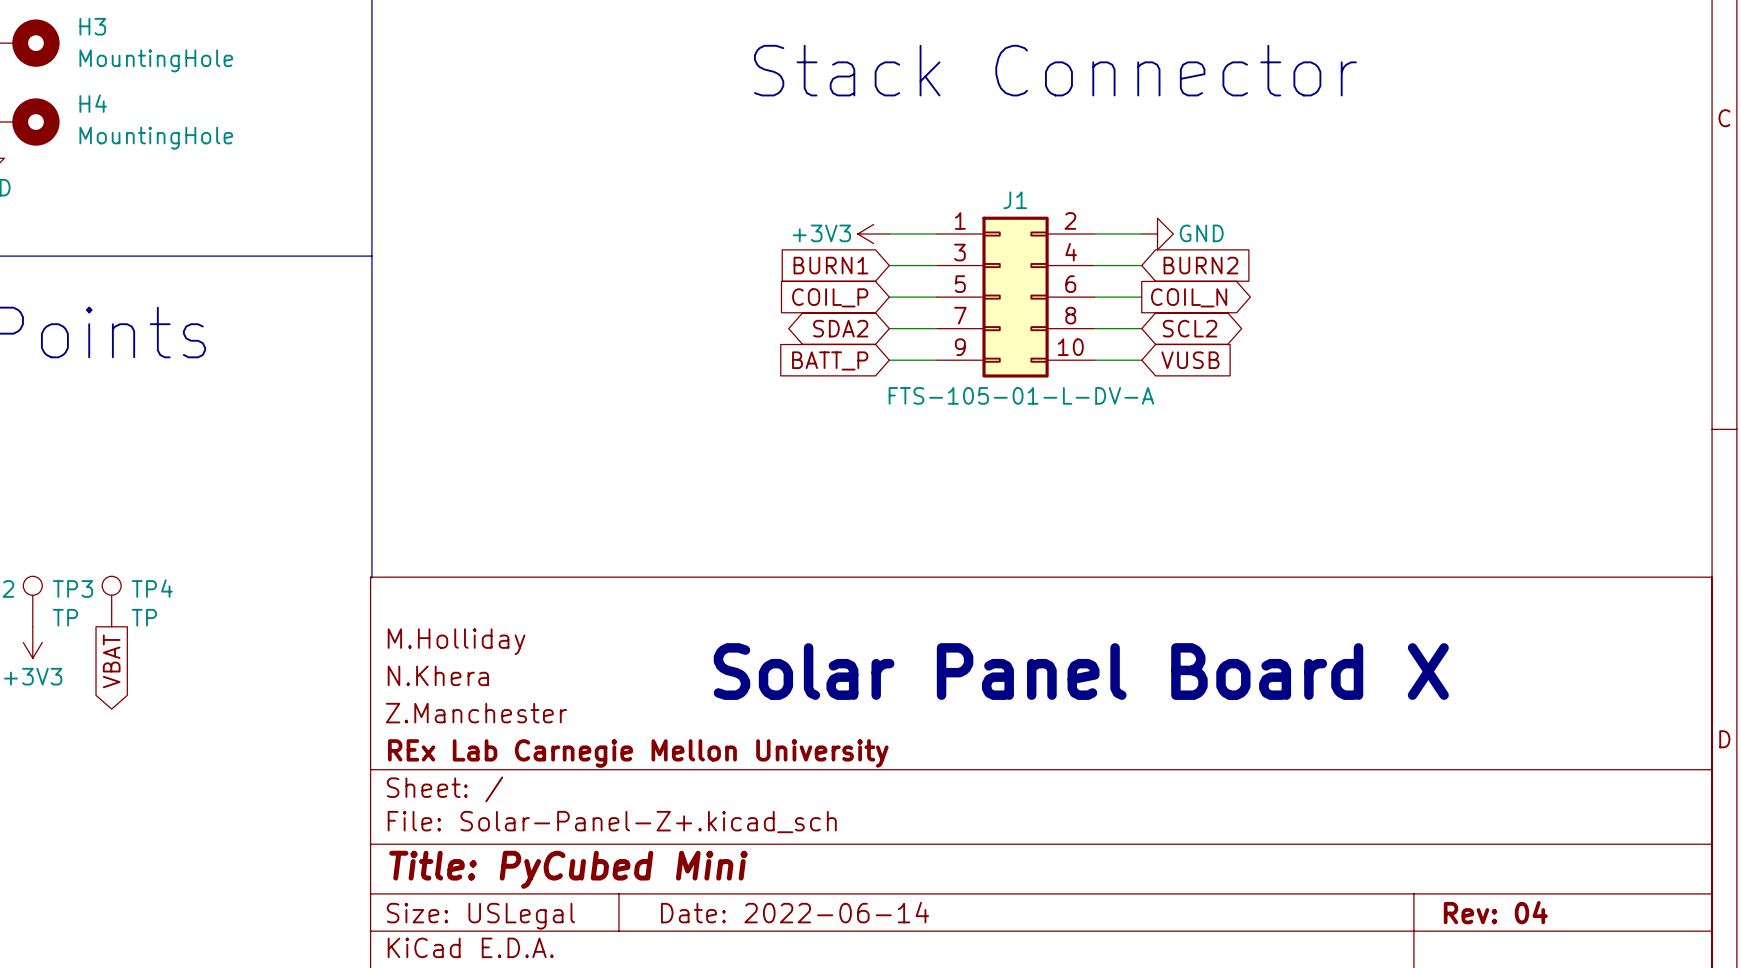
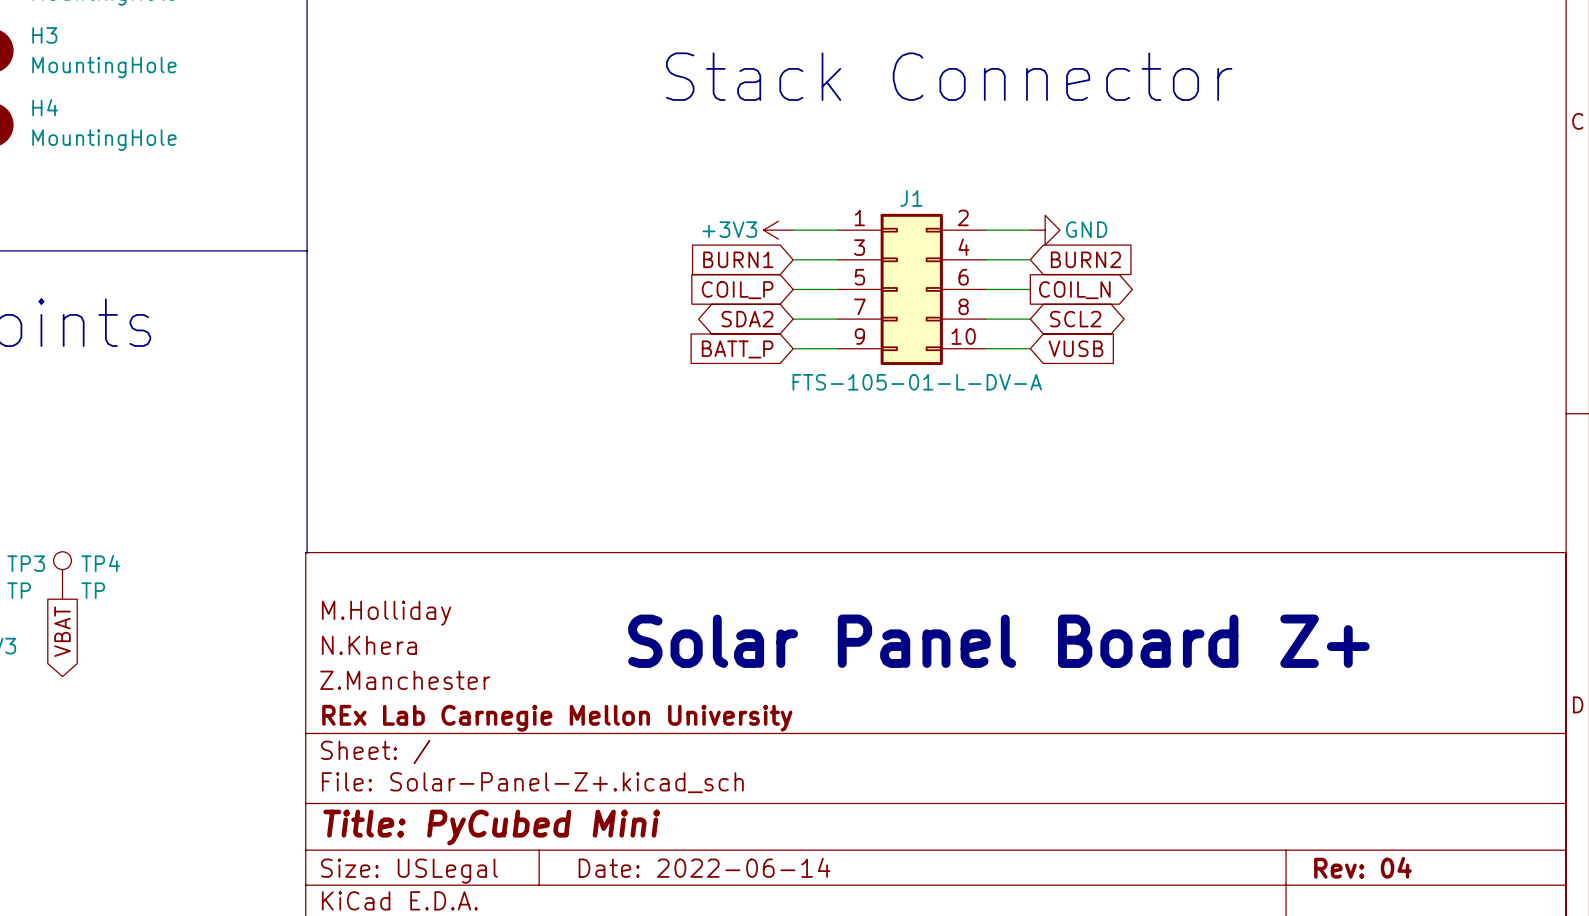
text: Solar Panel Board X (1081, 671) -> Solar Panel Board Z+ (998, 641)

